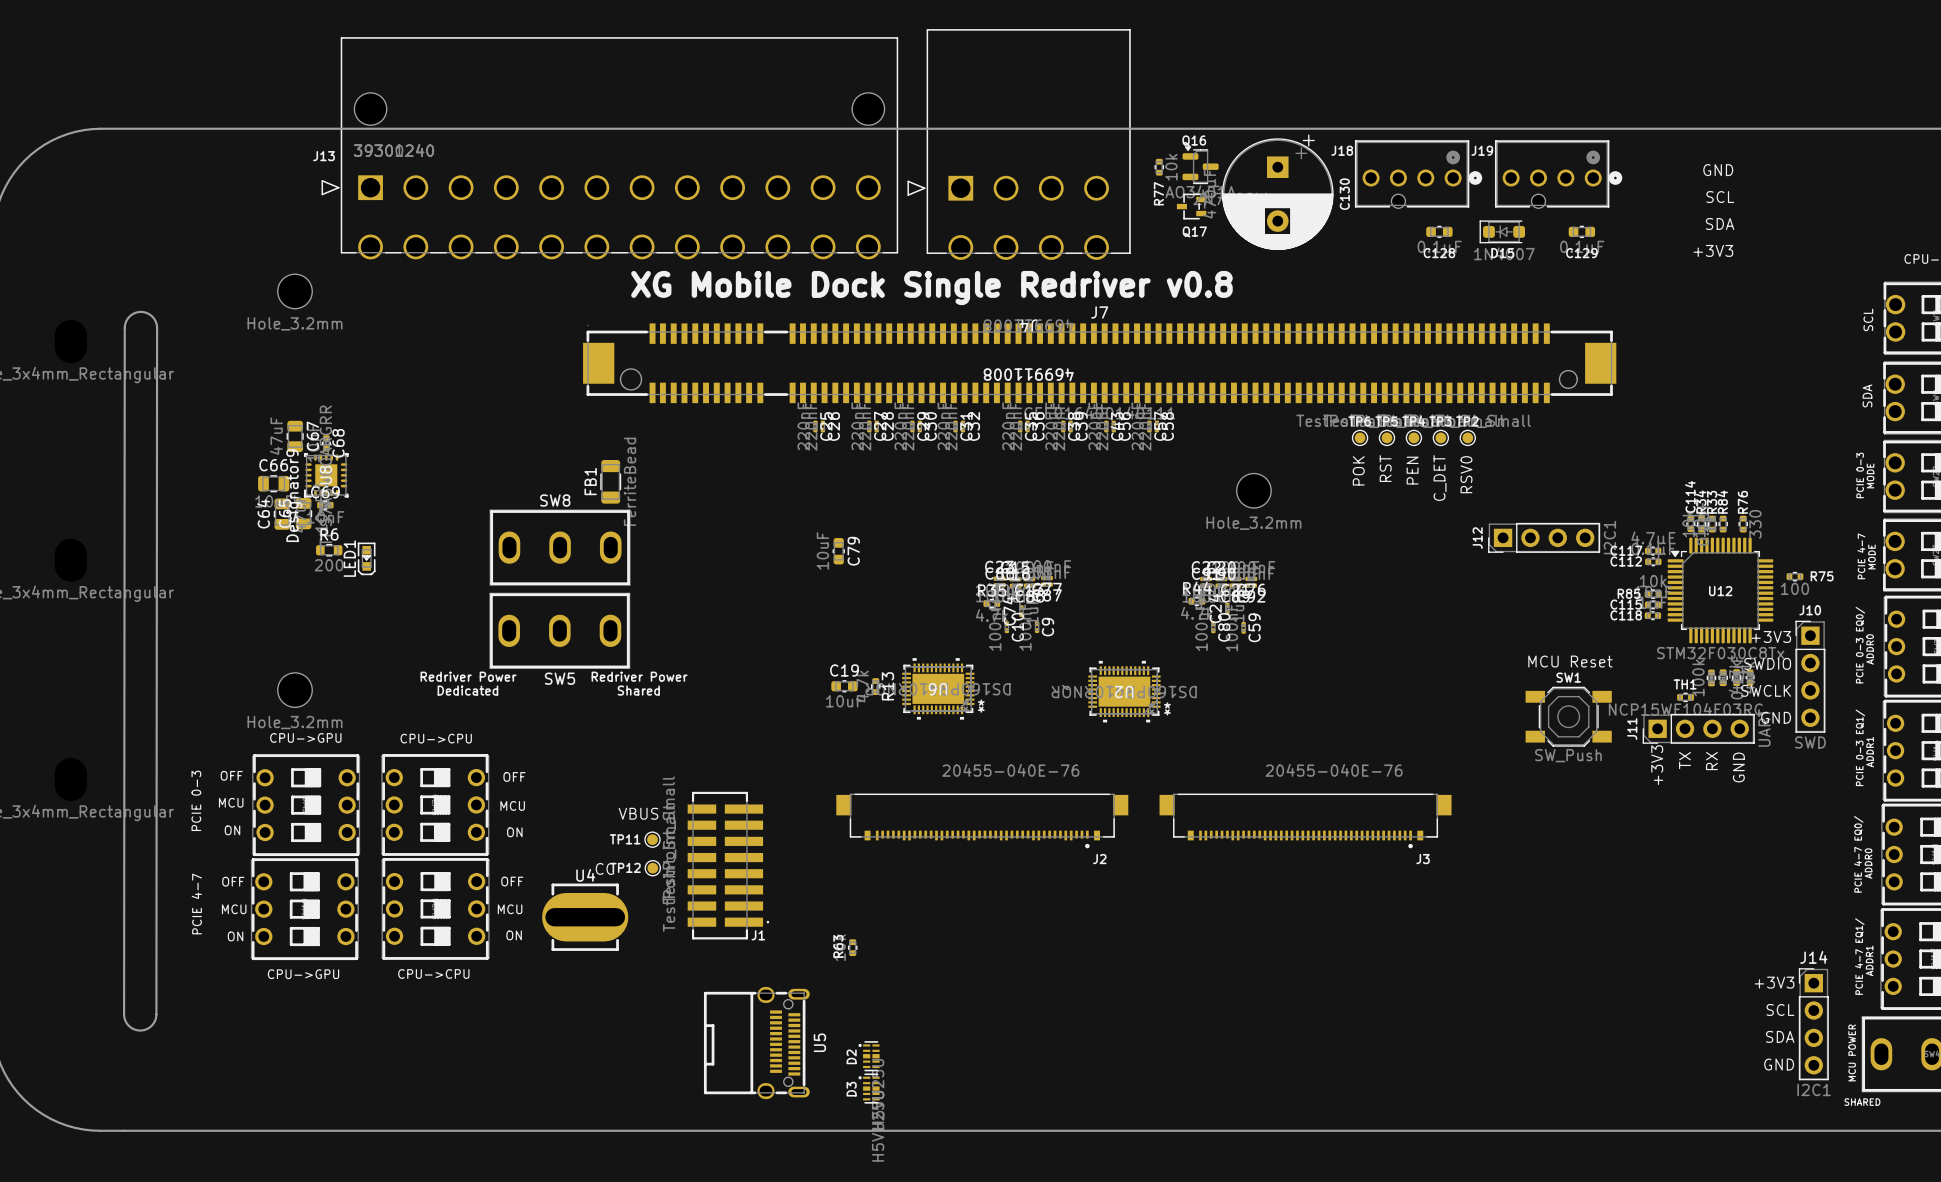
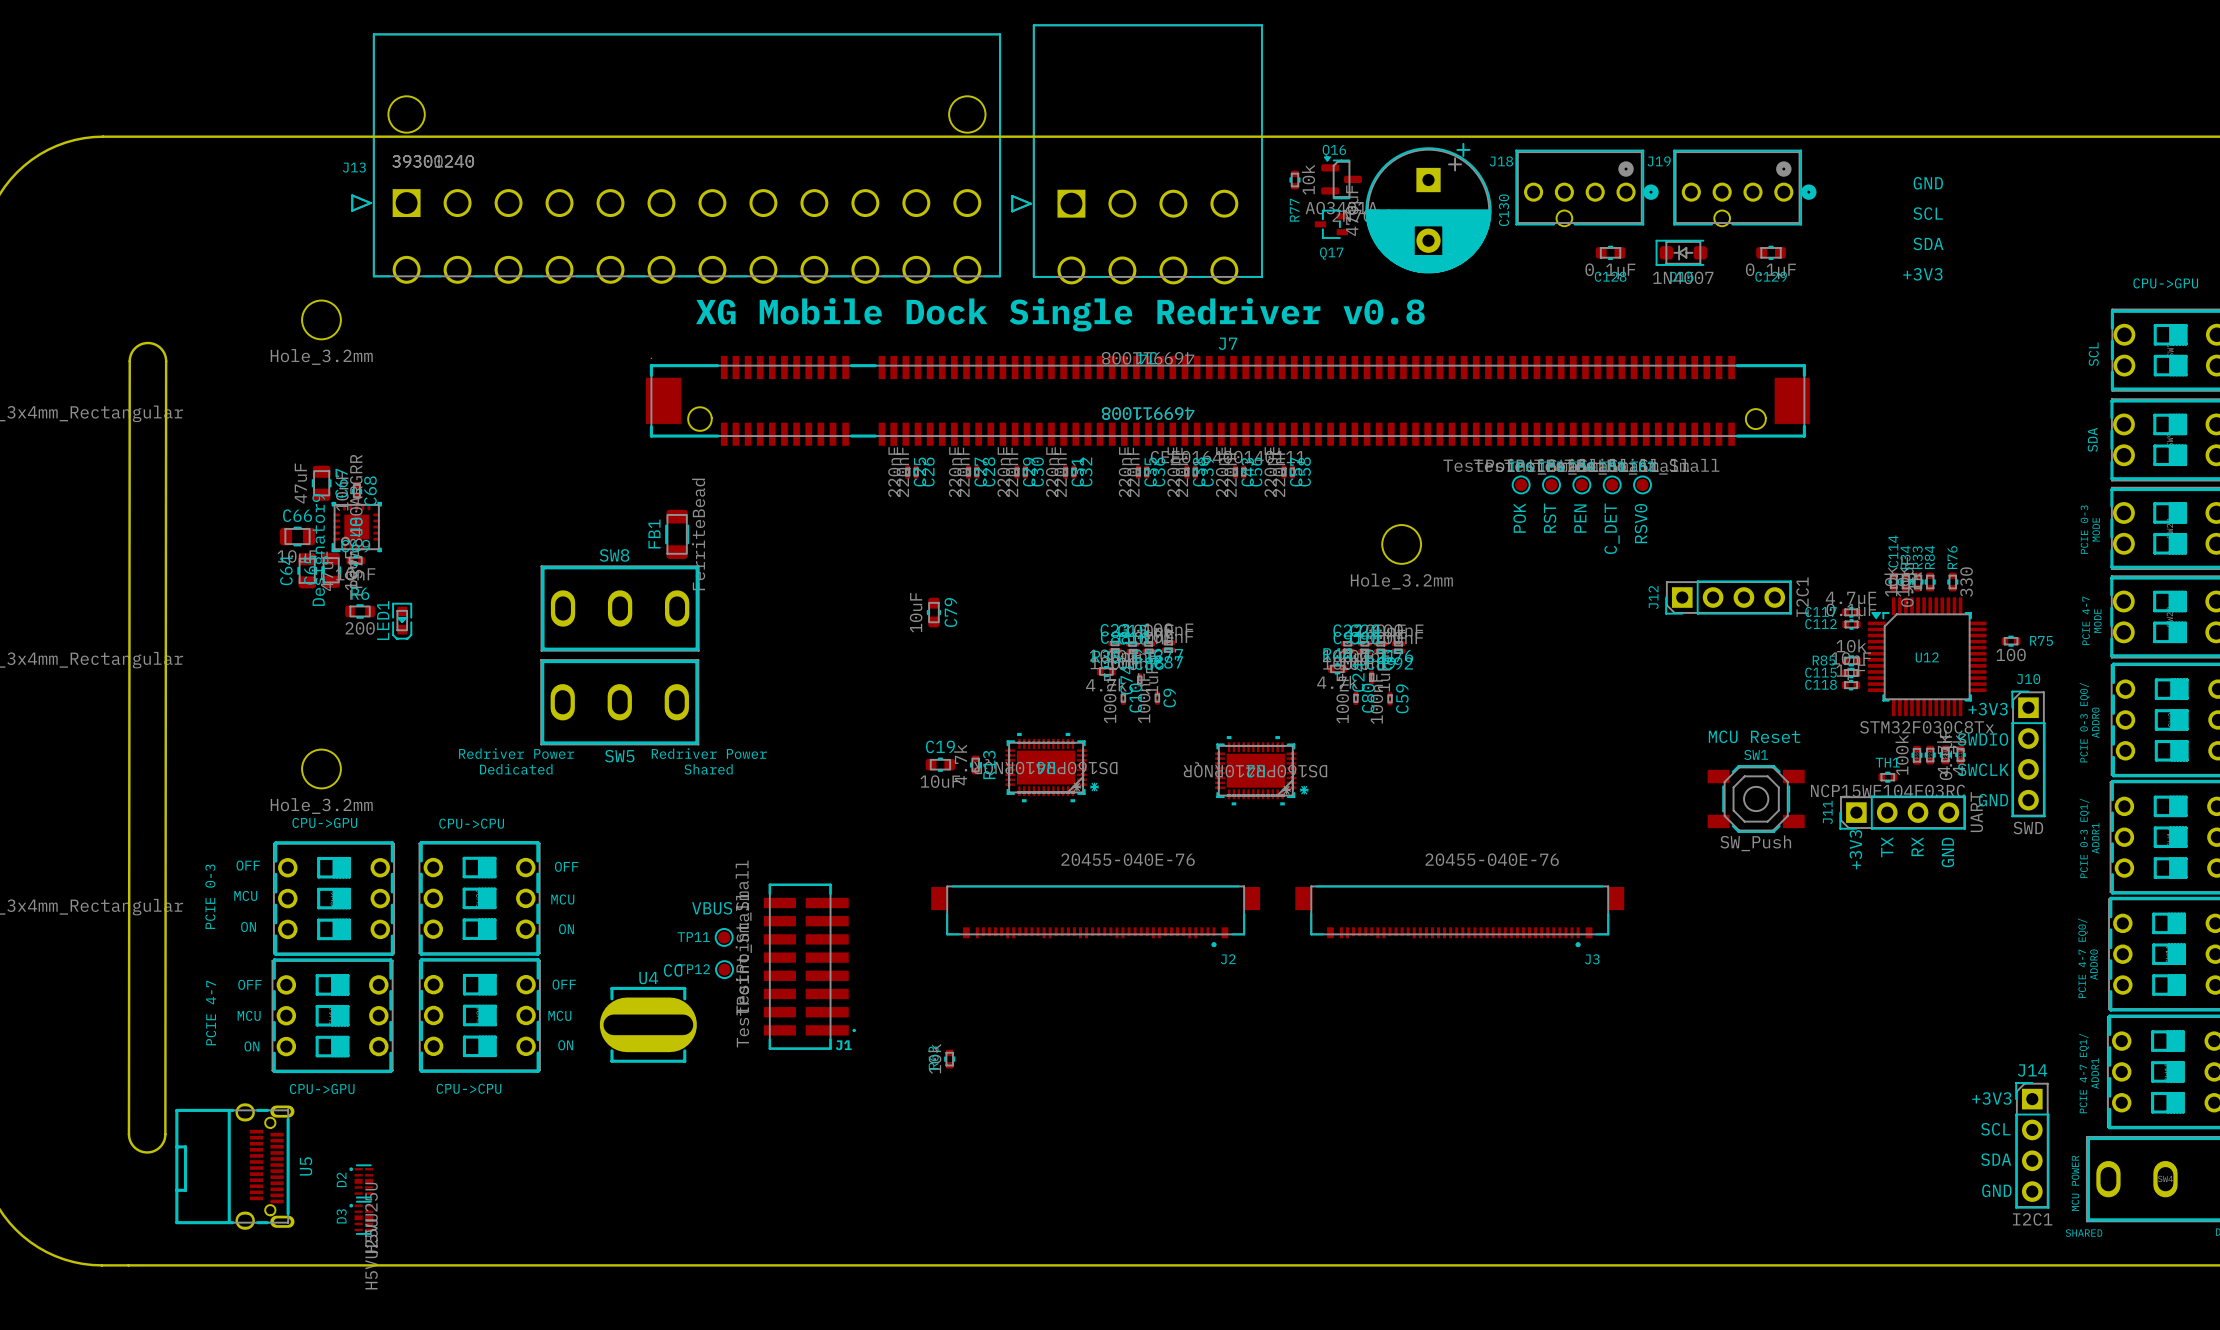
U5 position: (756, 1043) -> (234, 1166)
D2 position: (869, 1056) -> (361, 1181)
D3 position: (869, 1088) -> (361, 1217)

